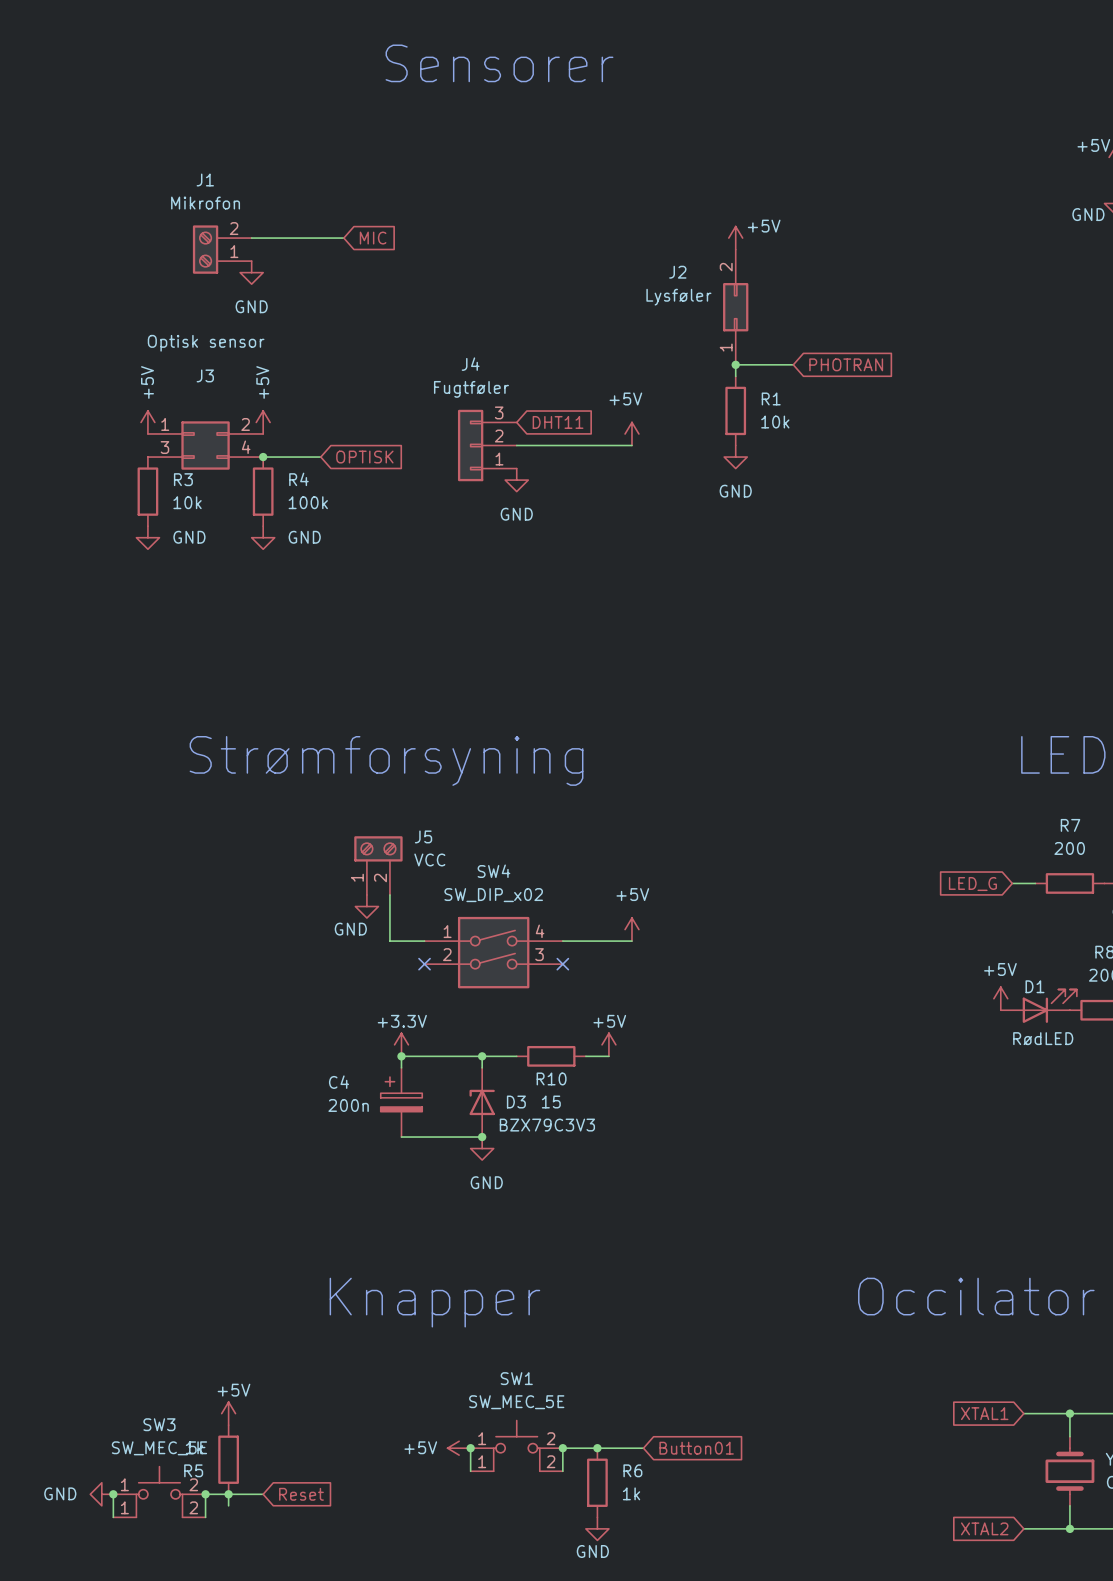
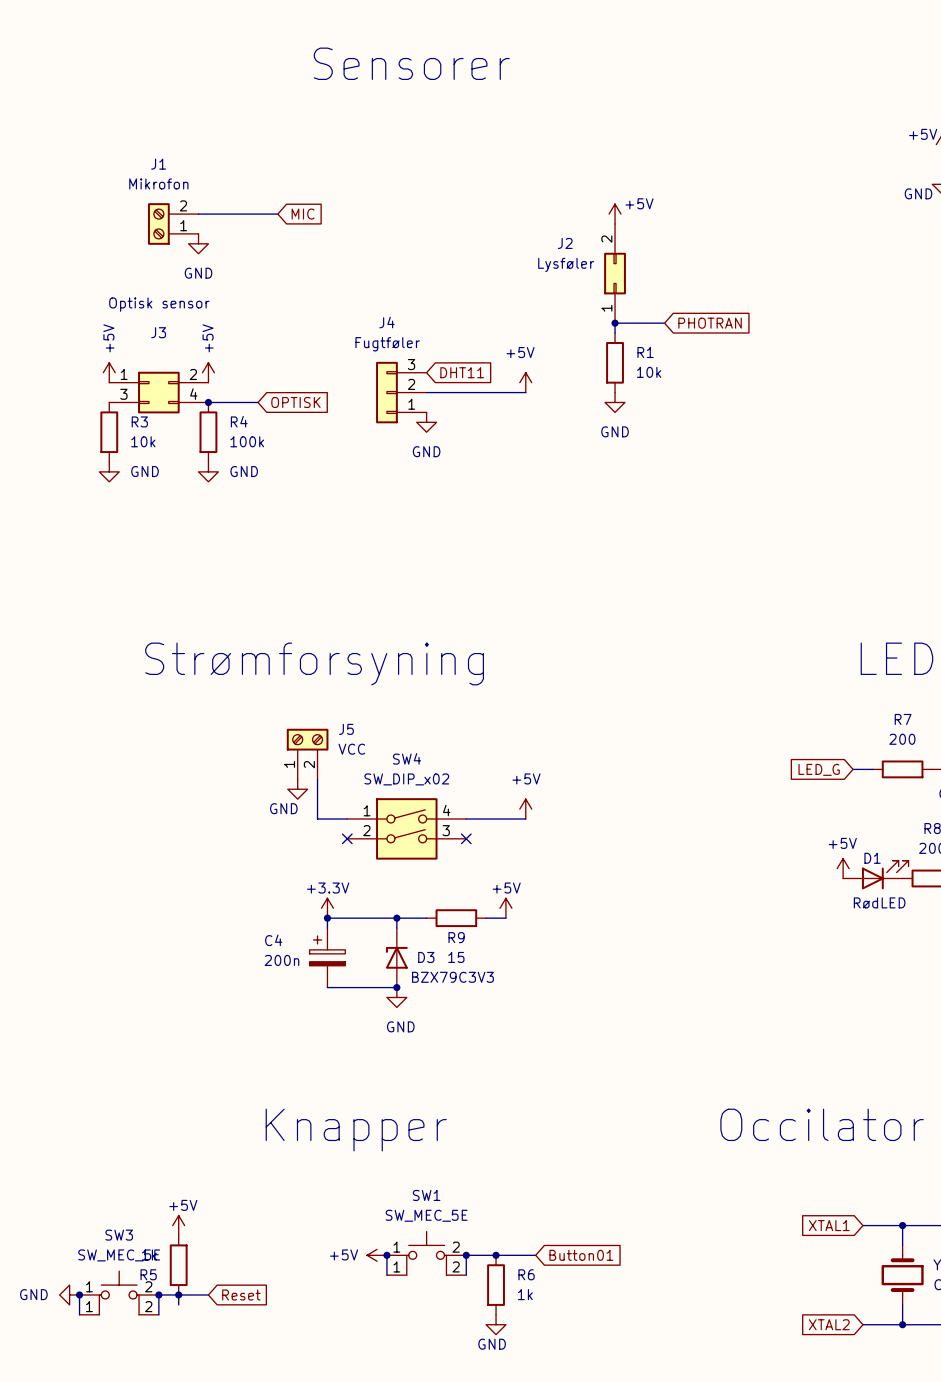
R10 name: R10 (551, 1078) -> R9 (456, 937)

